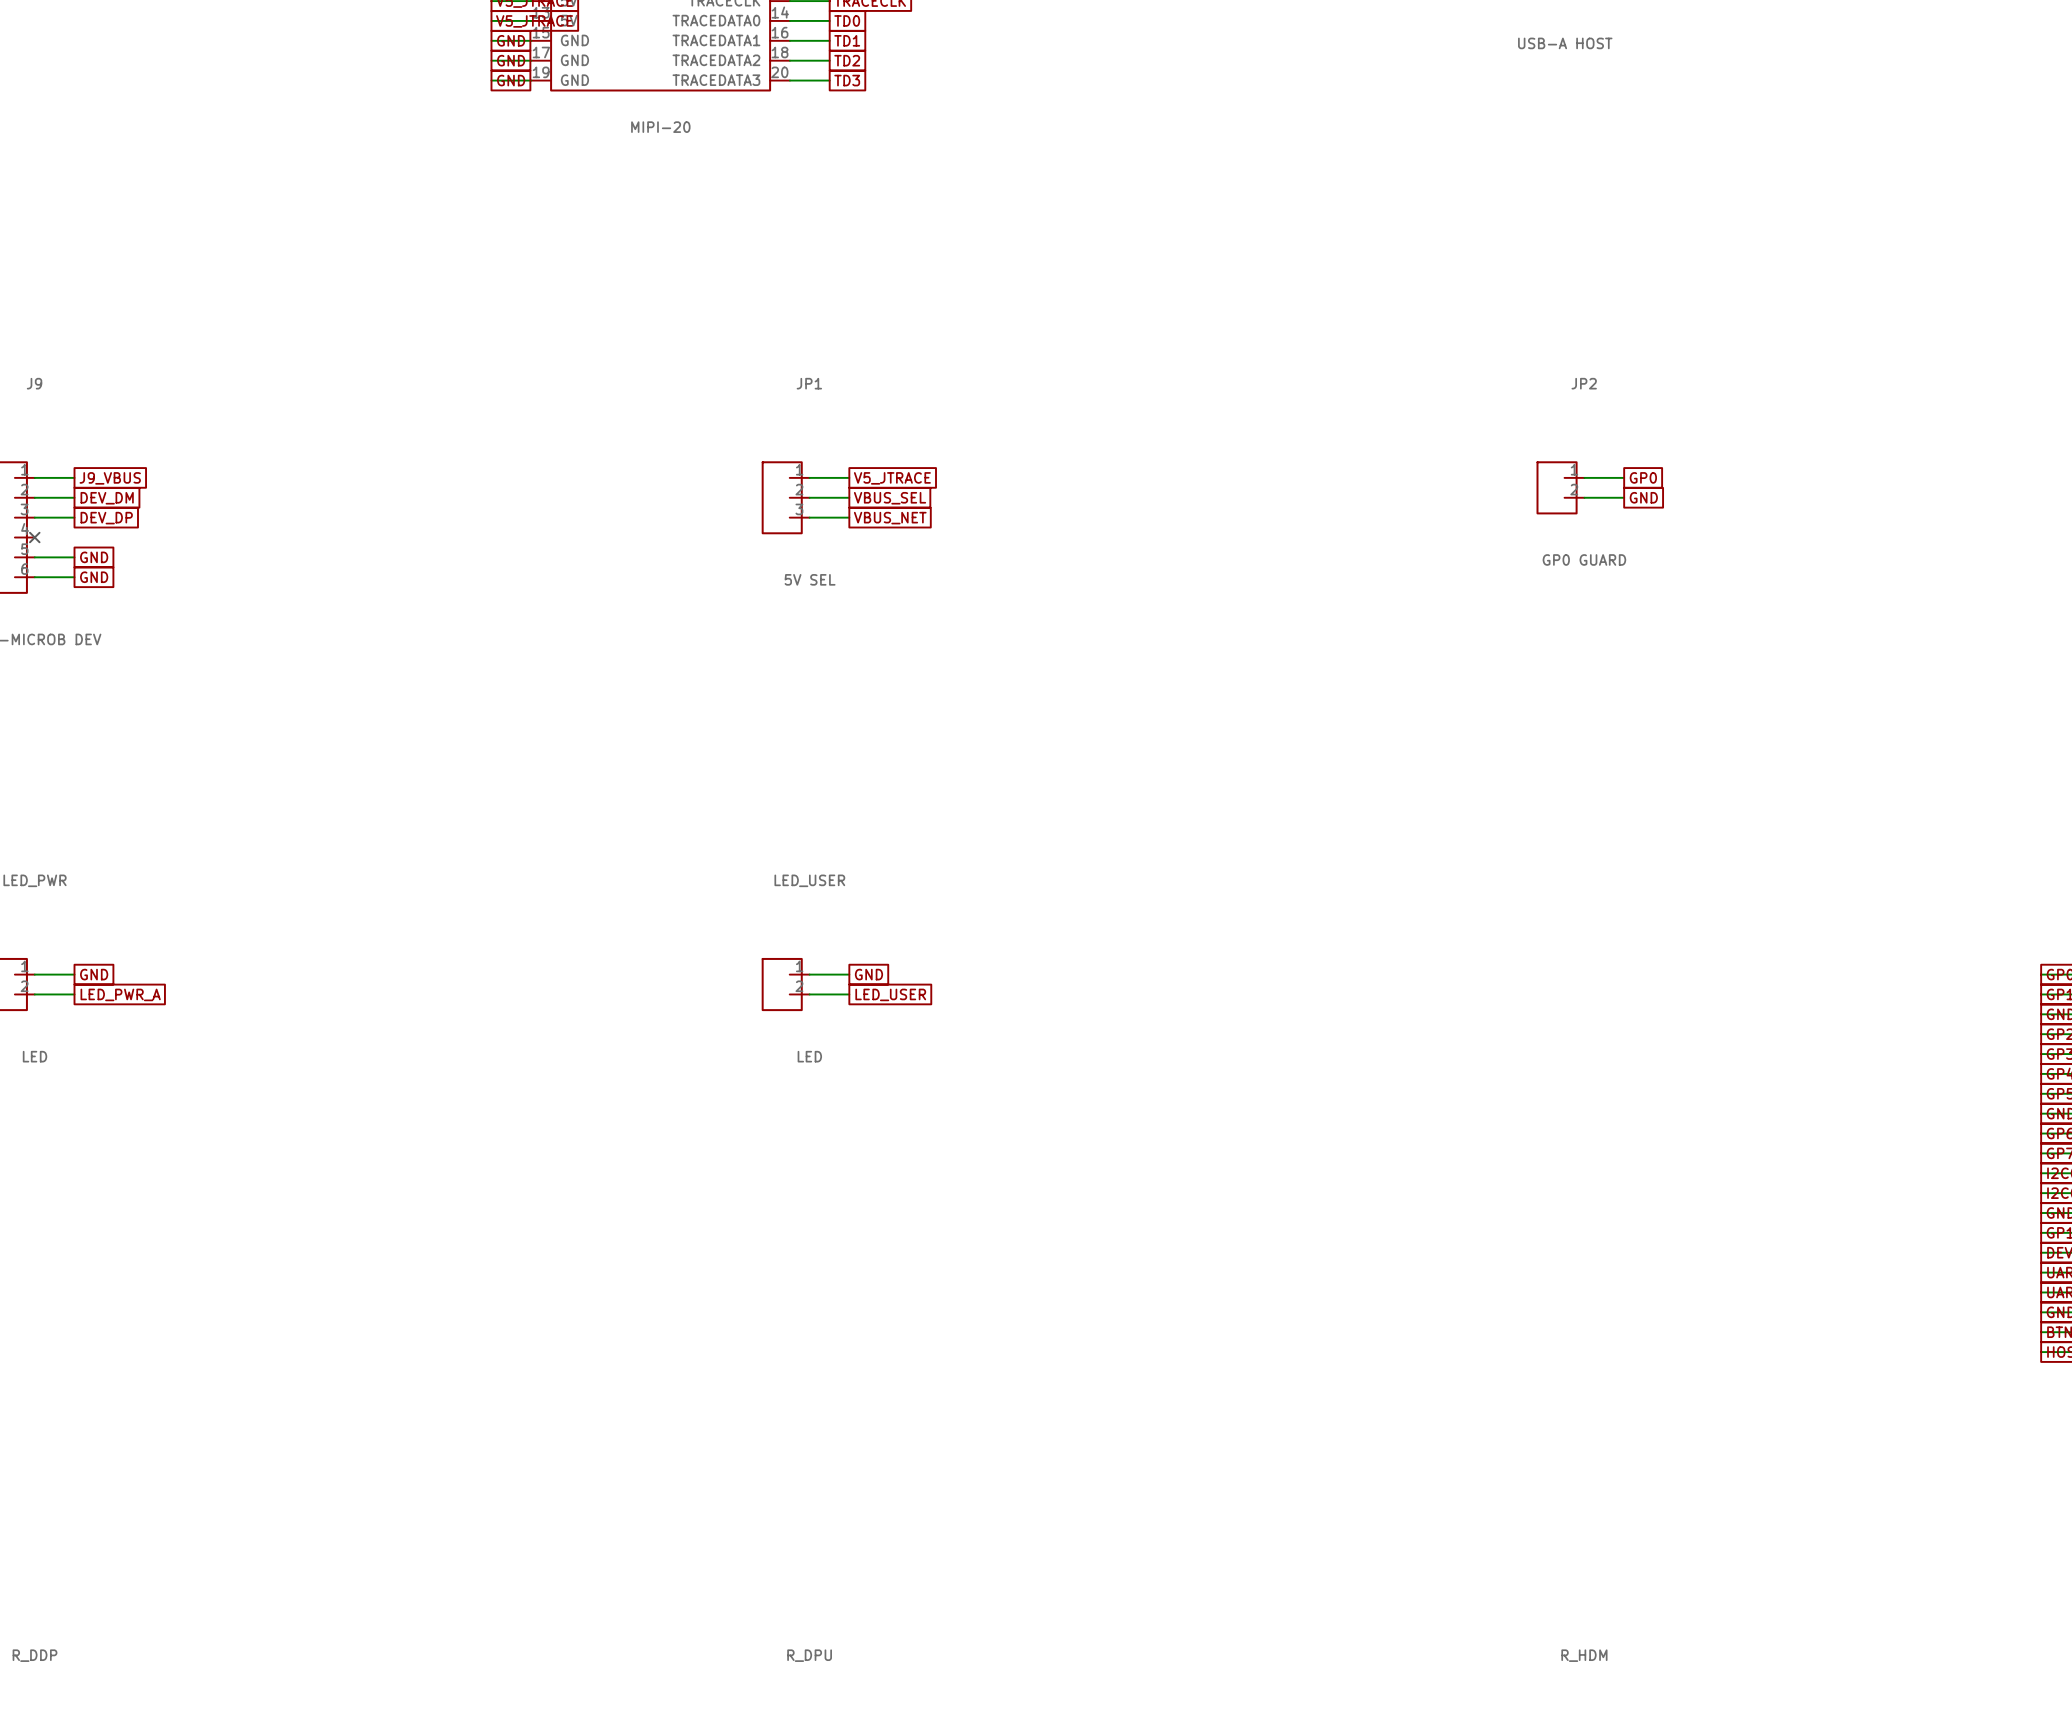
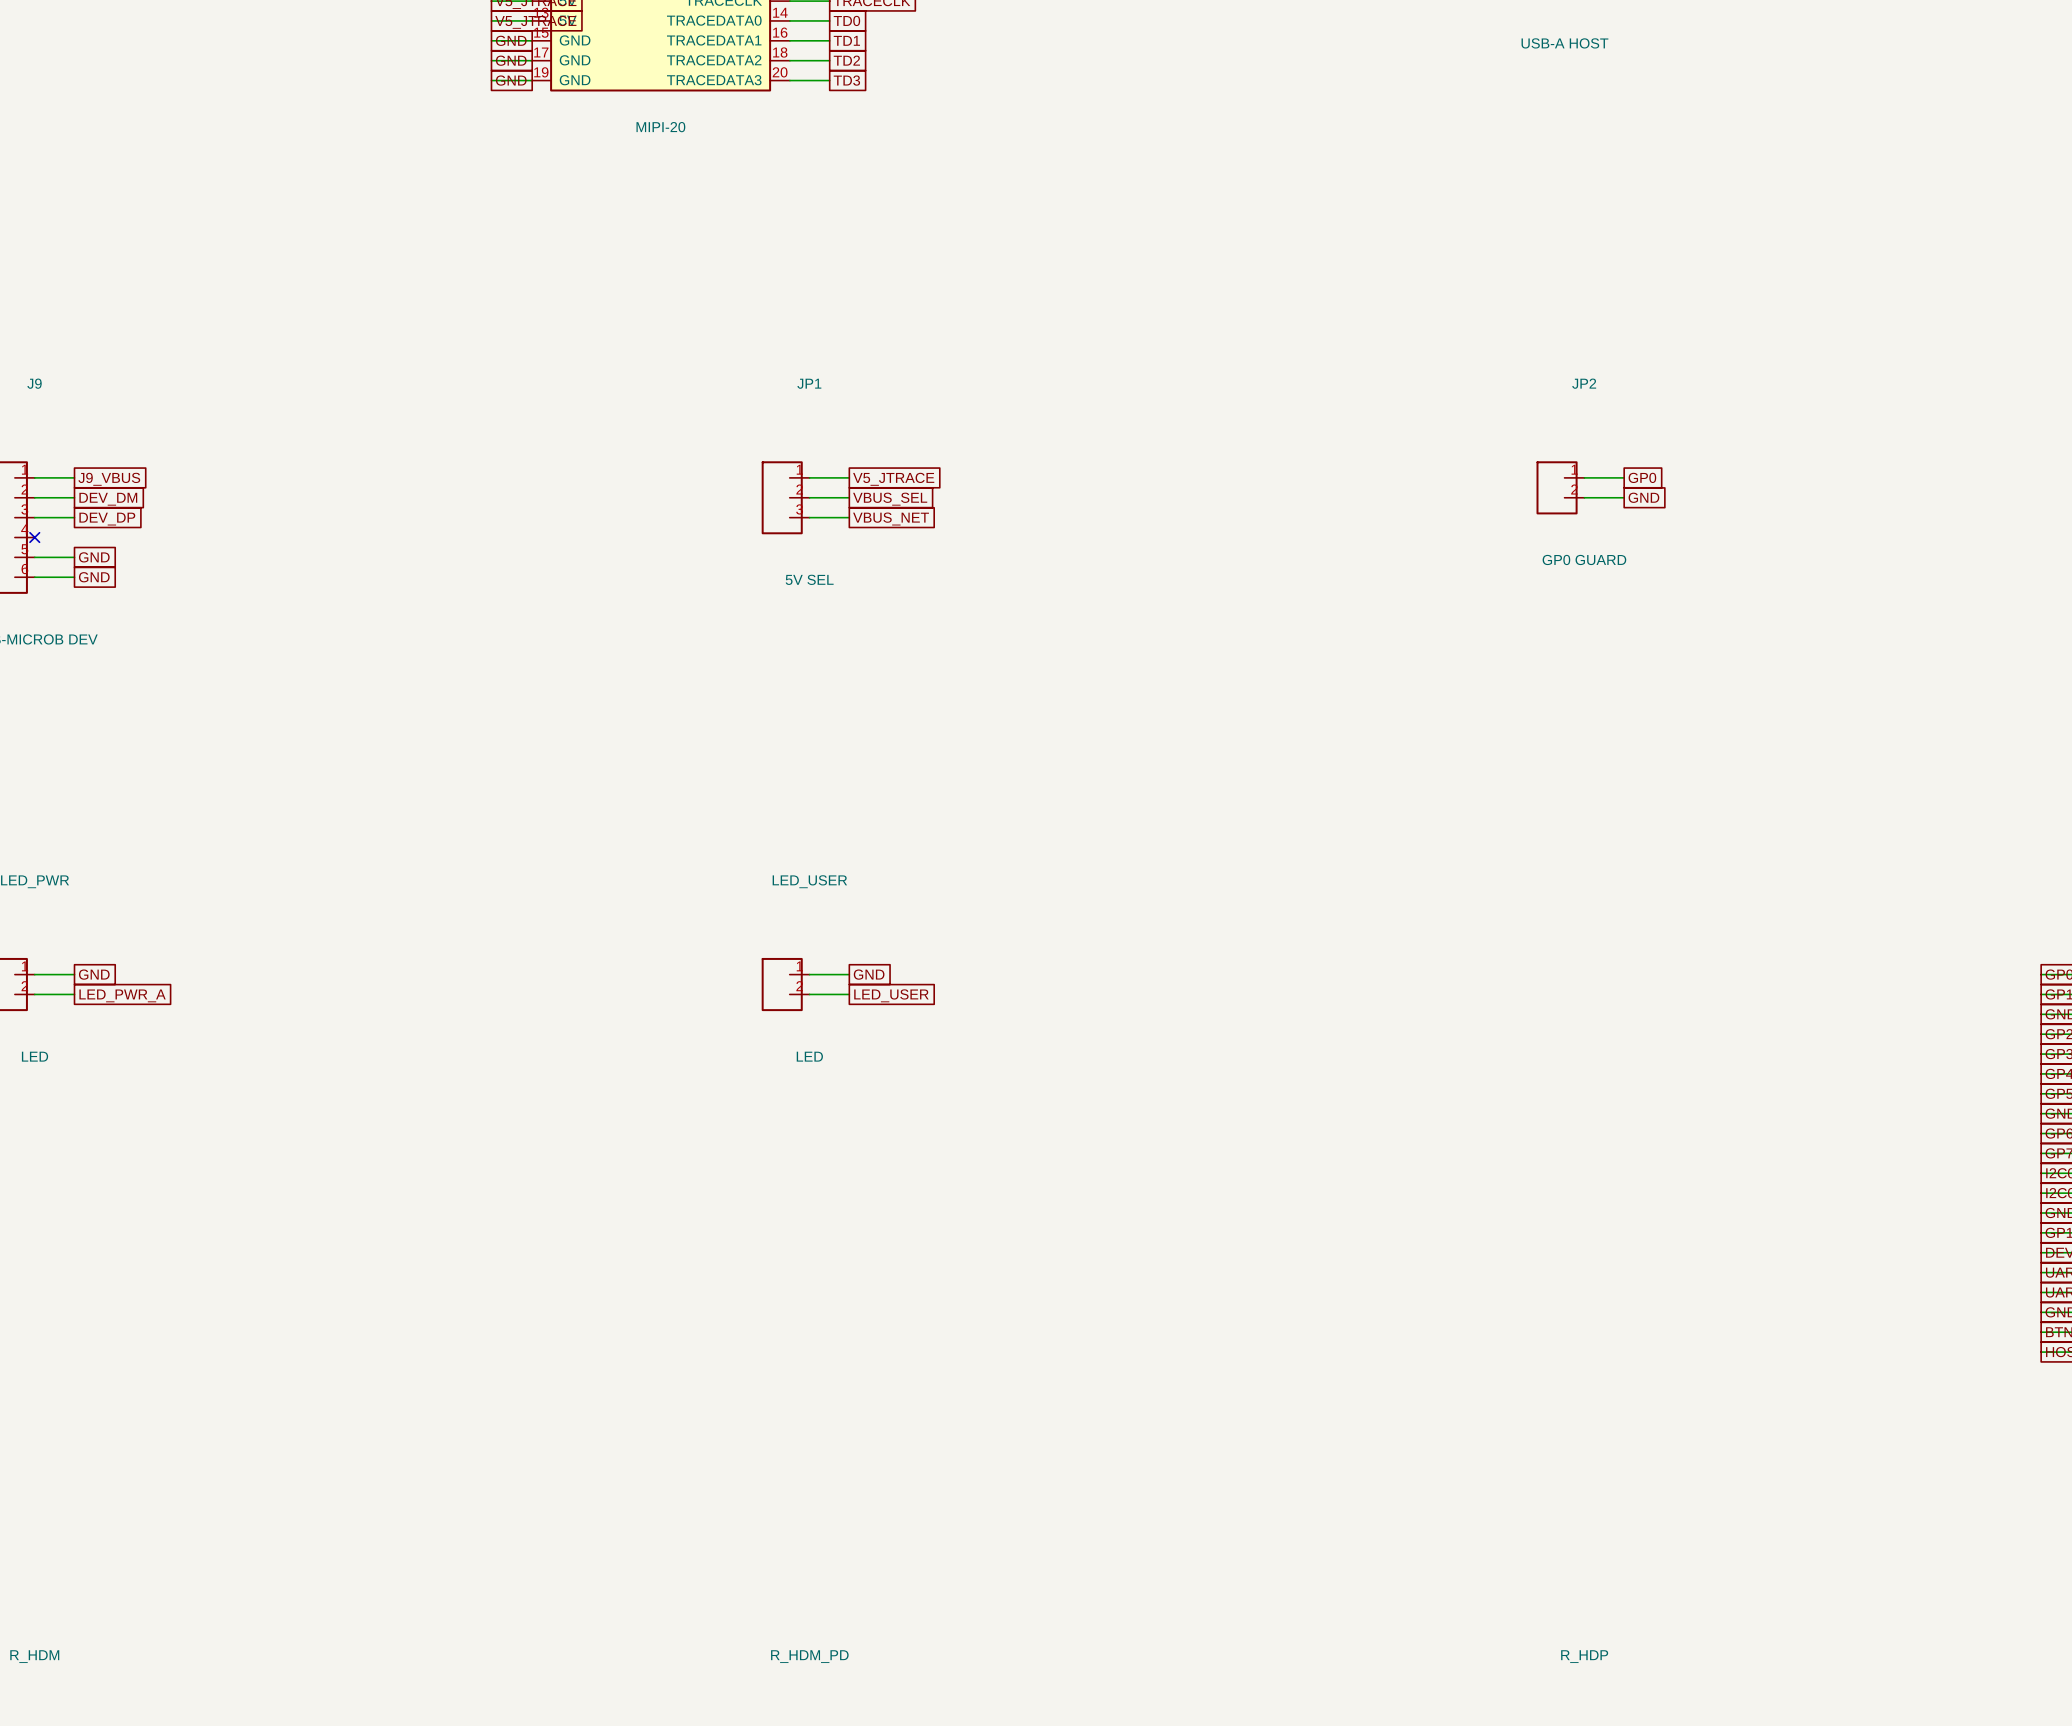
R_DDP name: R_DDP (35, 1655) -> R_HDM (34, 1656)
R_DPU name: R_DPU (809, 1655) -> R_HDM_PD (809, 1656)
R_HDM name: R_HDM (1584, 1655) -> R_HDP (1584, 1656)

